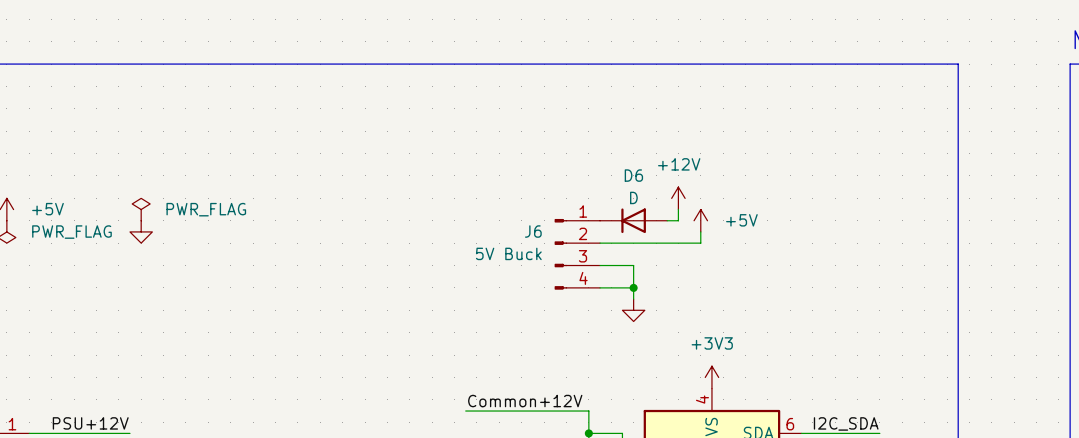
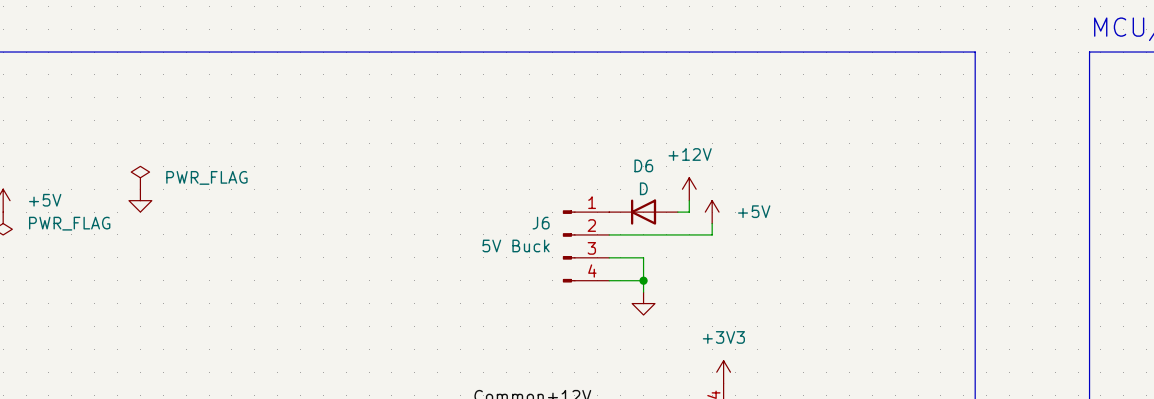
power symbol: none -> PWR_FLAG (140, 177)
power symbol shape: [132, 198, 151, 221] -> [128, 189, 152, 213]
power symbol text: PWR_FLAG (206, 209) -> none
power symbol: (141, 231) -> none

